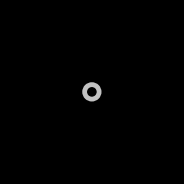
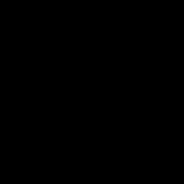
via: (91, 91) -> none

